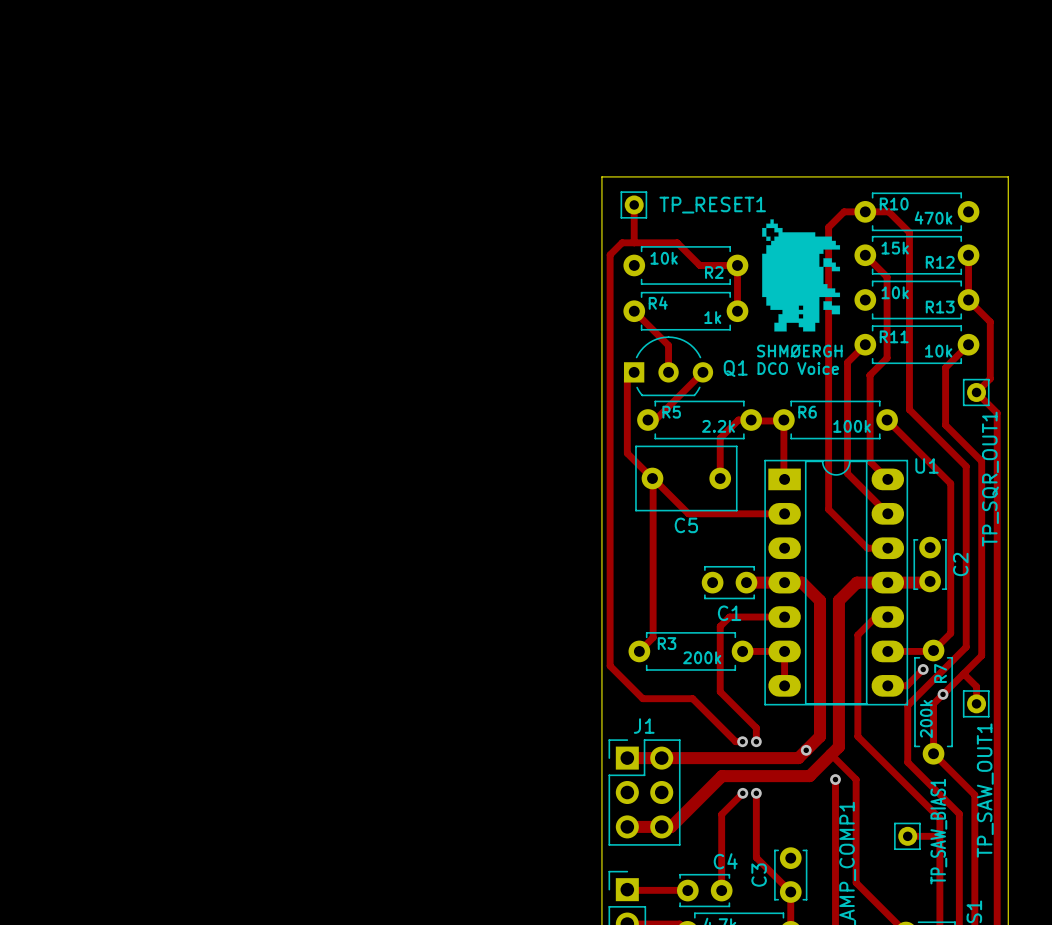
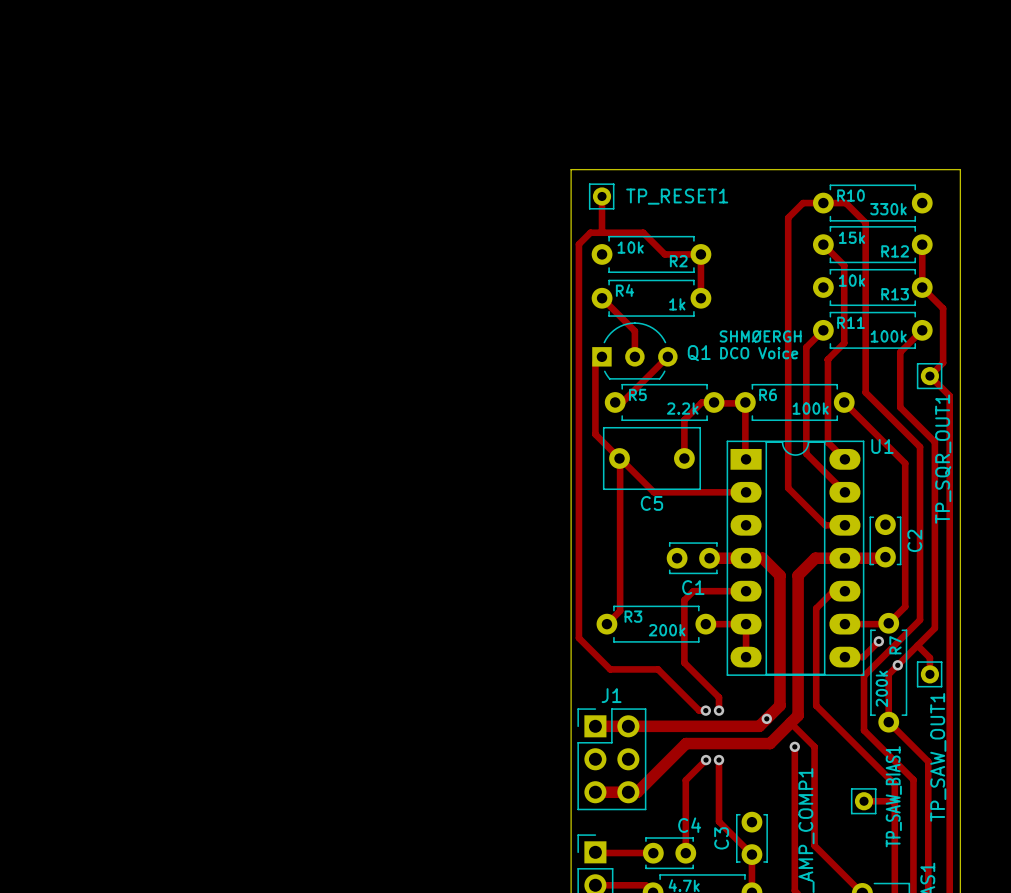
R10 value: 470k (933, 217) -> 330k (888, 209)
drawing: [762, 219, 841, 332] -> none
R11 value: 10k (938, 351) -> 100k (888, 336)

